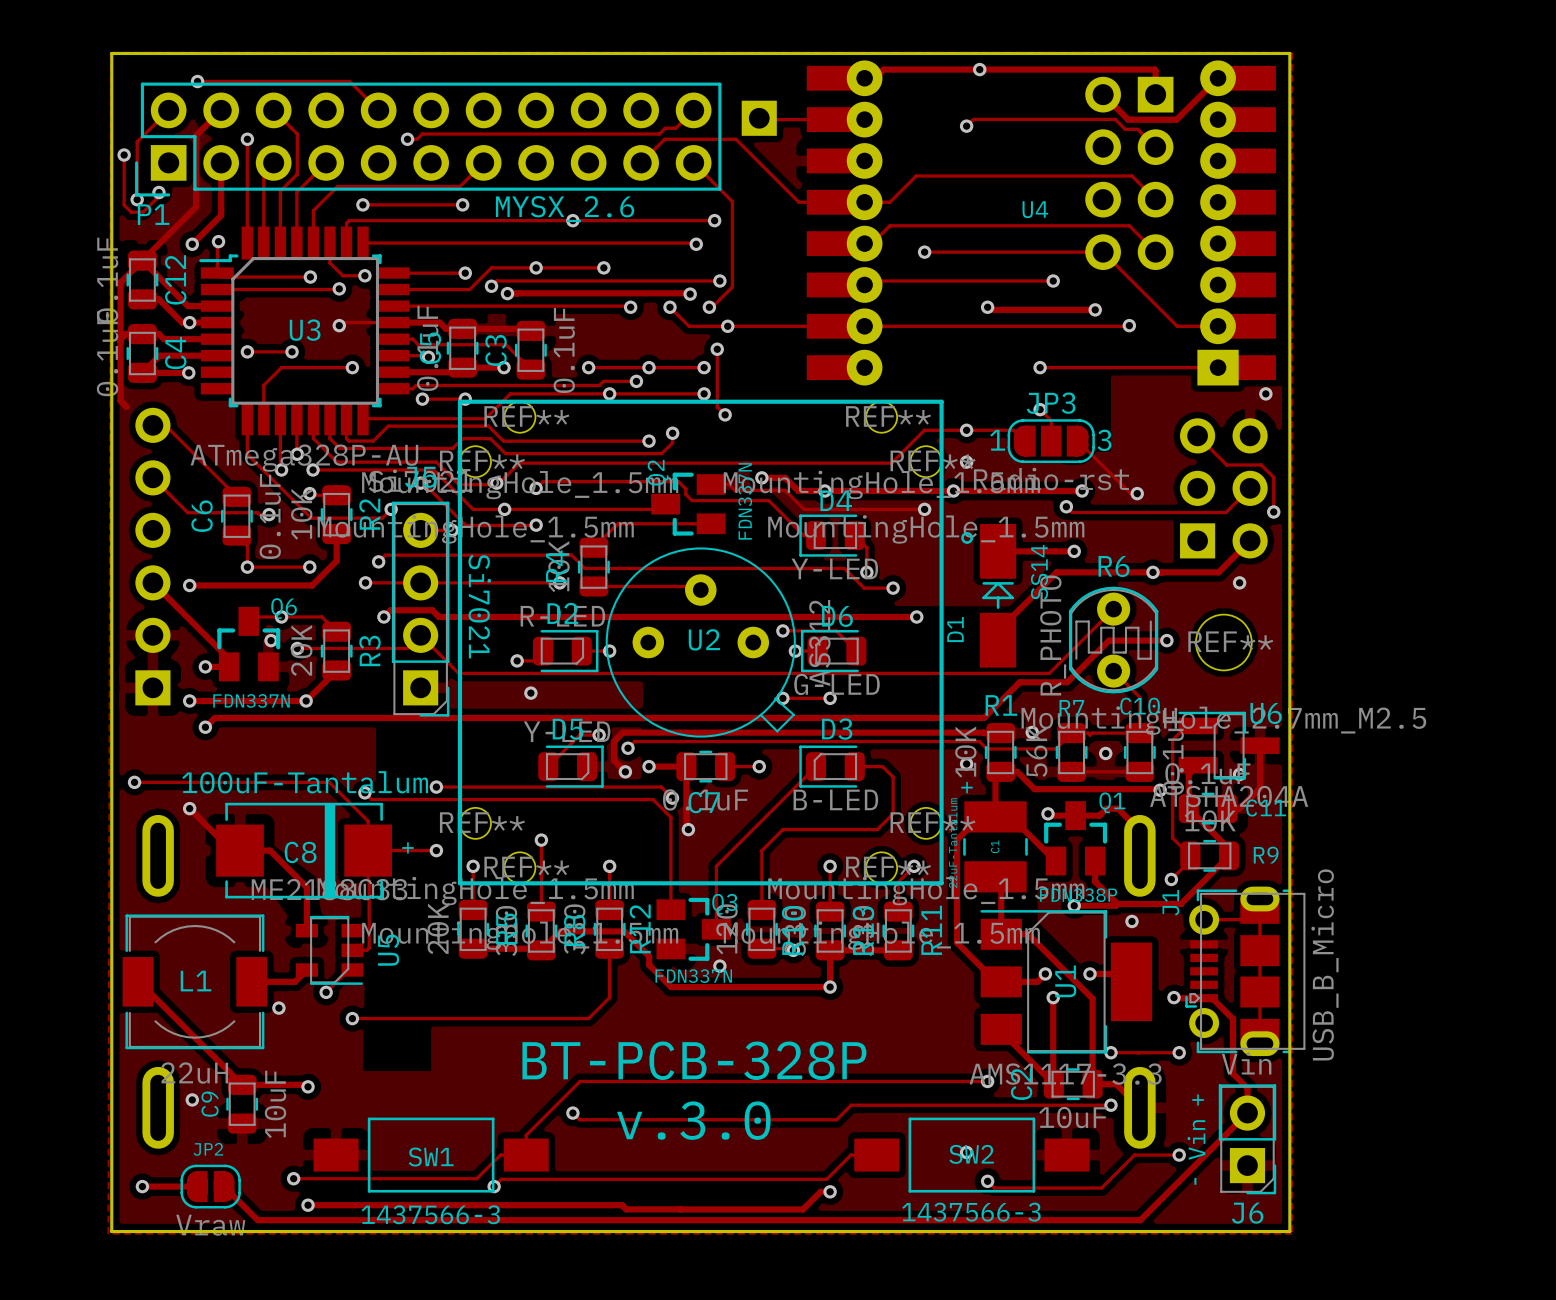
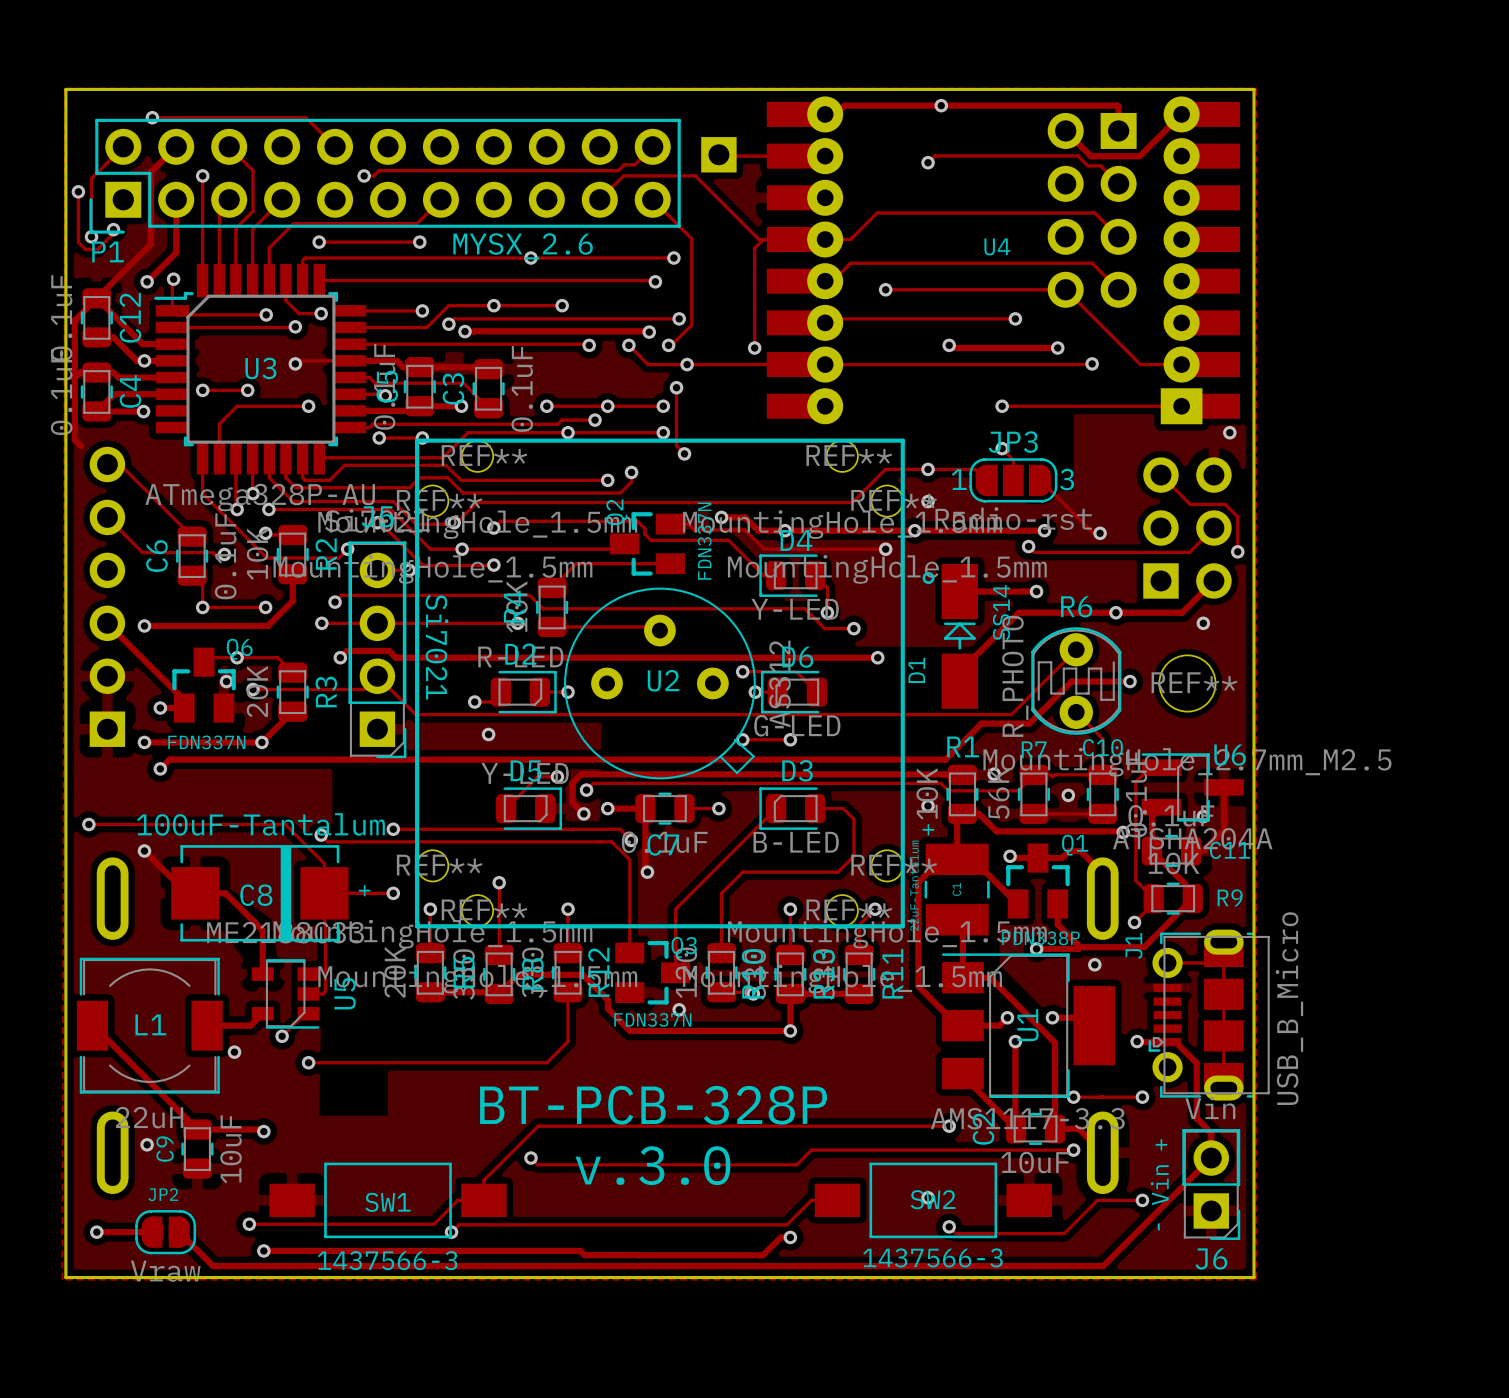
track: none -> (763, 239) (754, 248) (754, 348)
via: none -> (754, 348)

